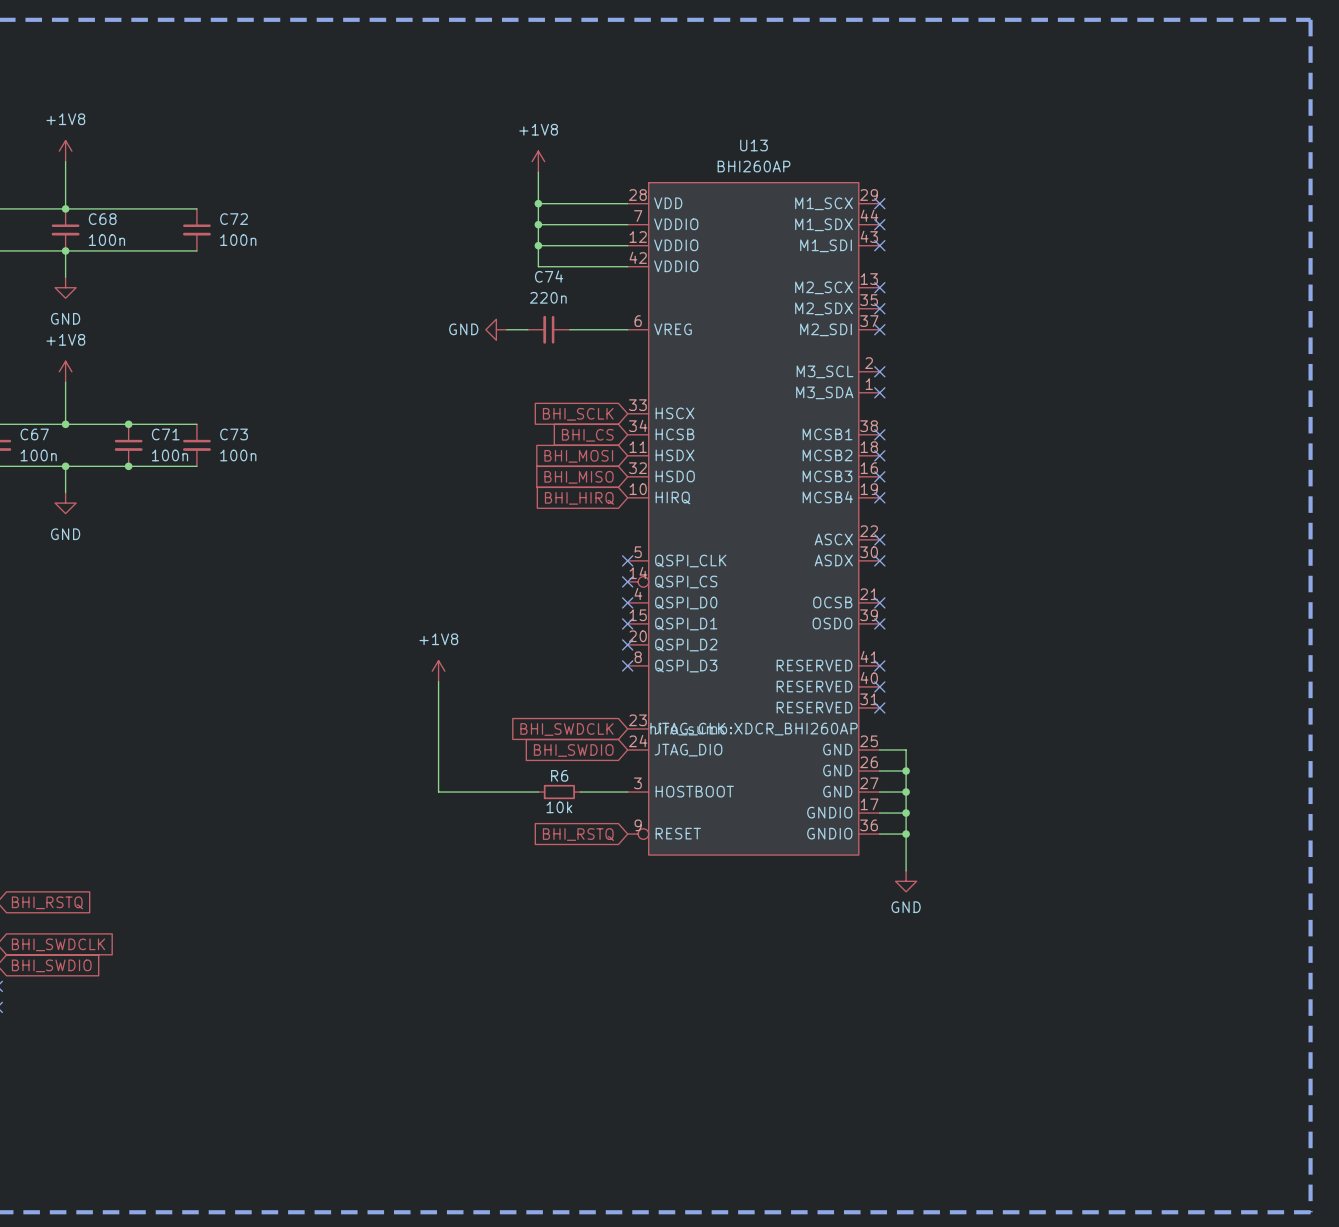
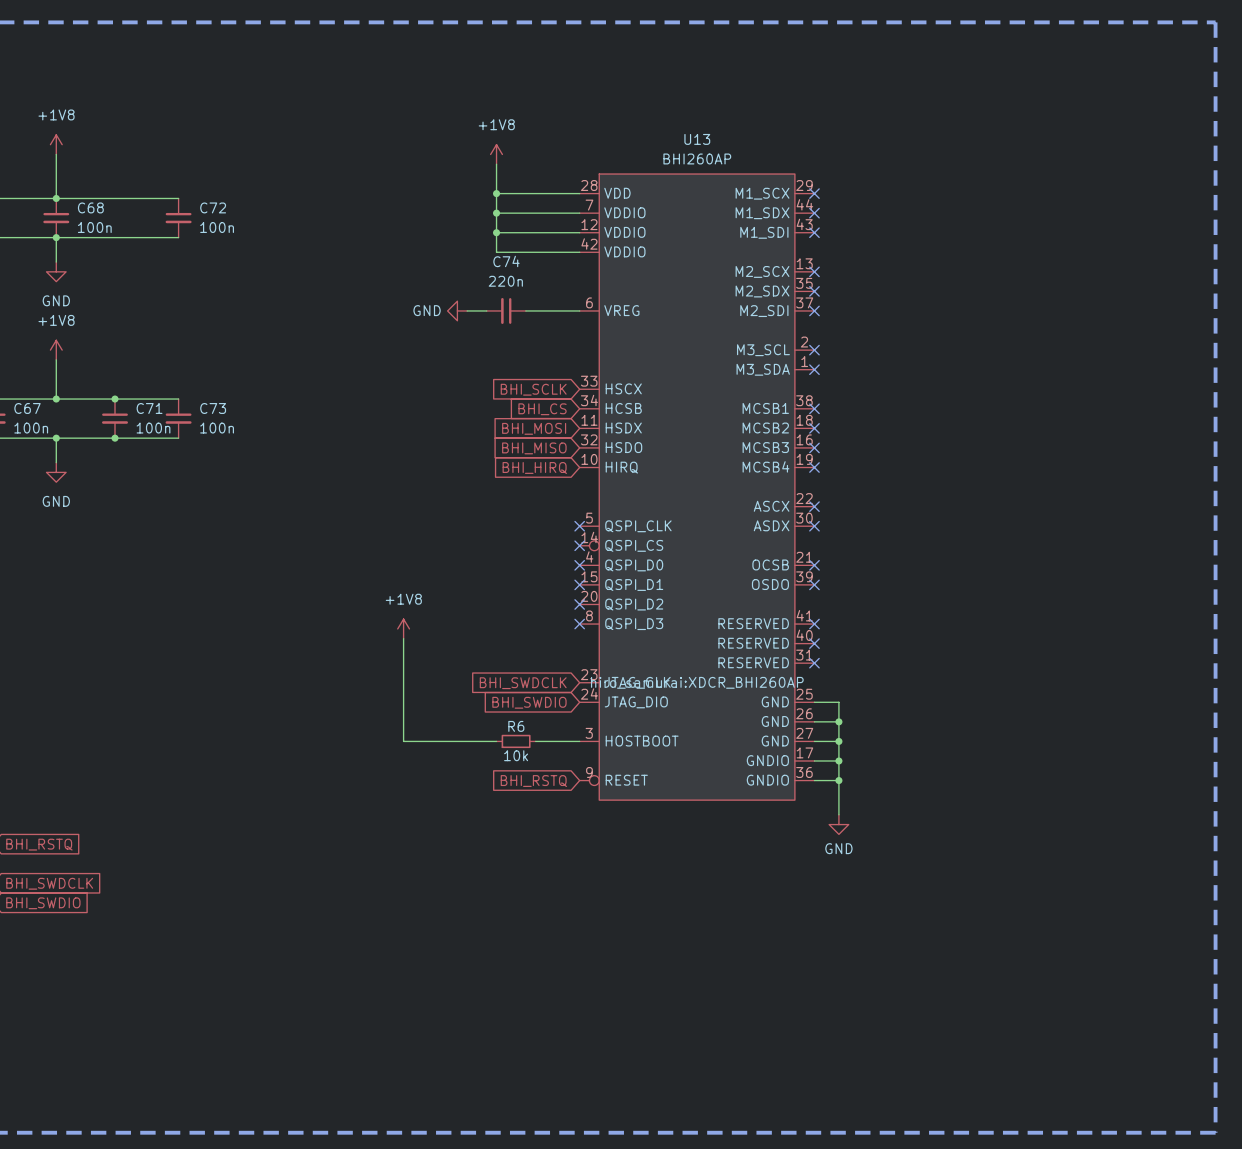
U13 text: hiro_sumo:XDCR_BHI260AP (754, 729) -> hiro_samurai:XDCR_BHI260AP (697, 682)

